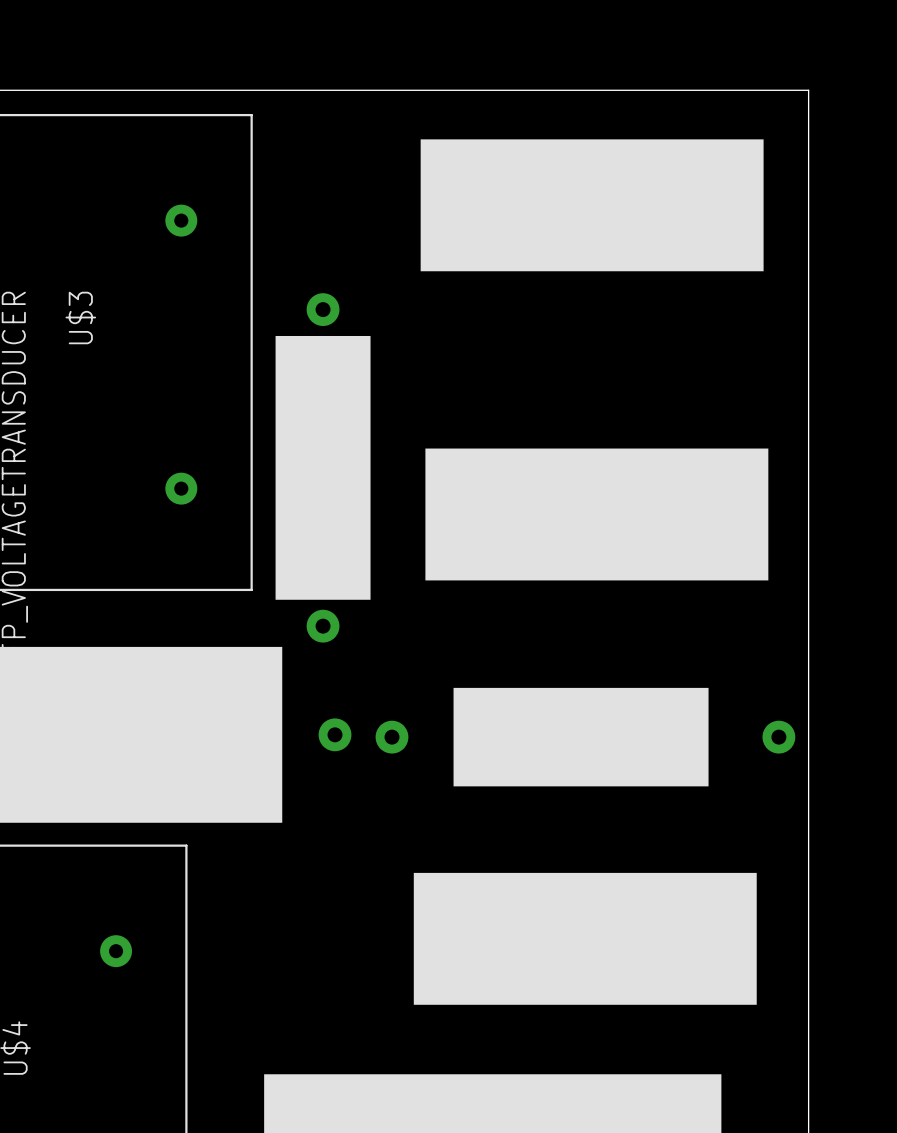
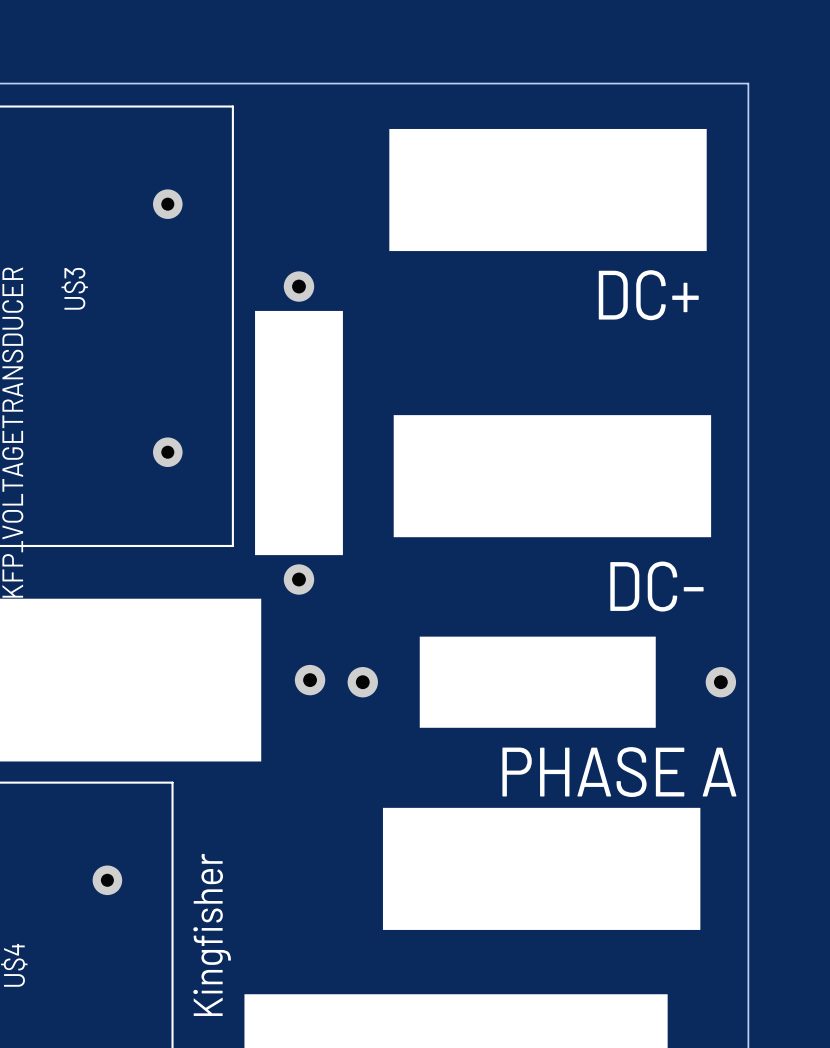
text: none -> DC+ (648, 295)
text: none -> DC- (656, 586)
text: none -> PHASE A (619, 772)
text: none -> Kingfisher (212, 934)

